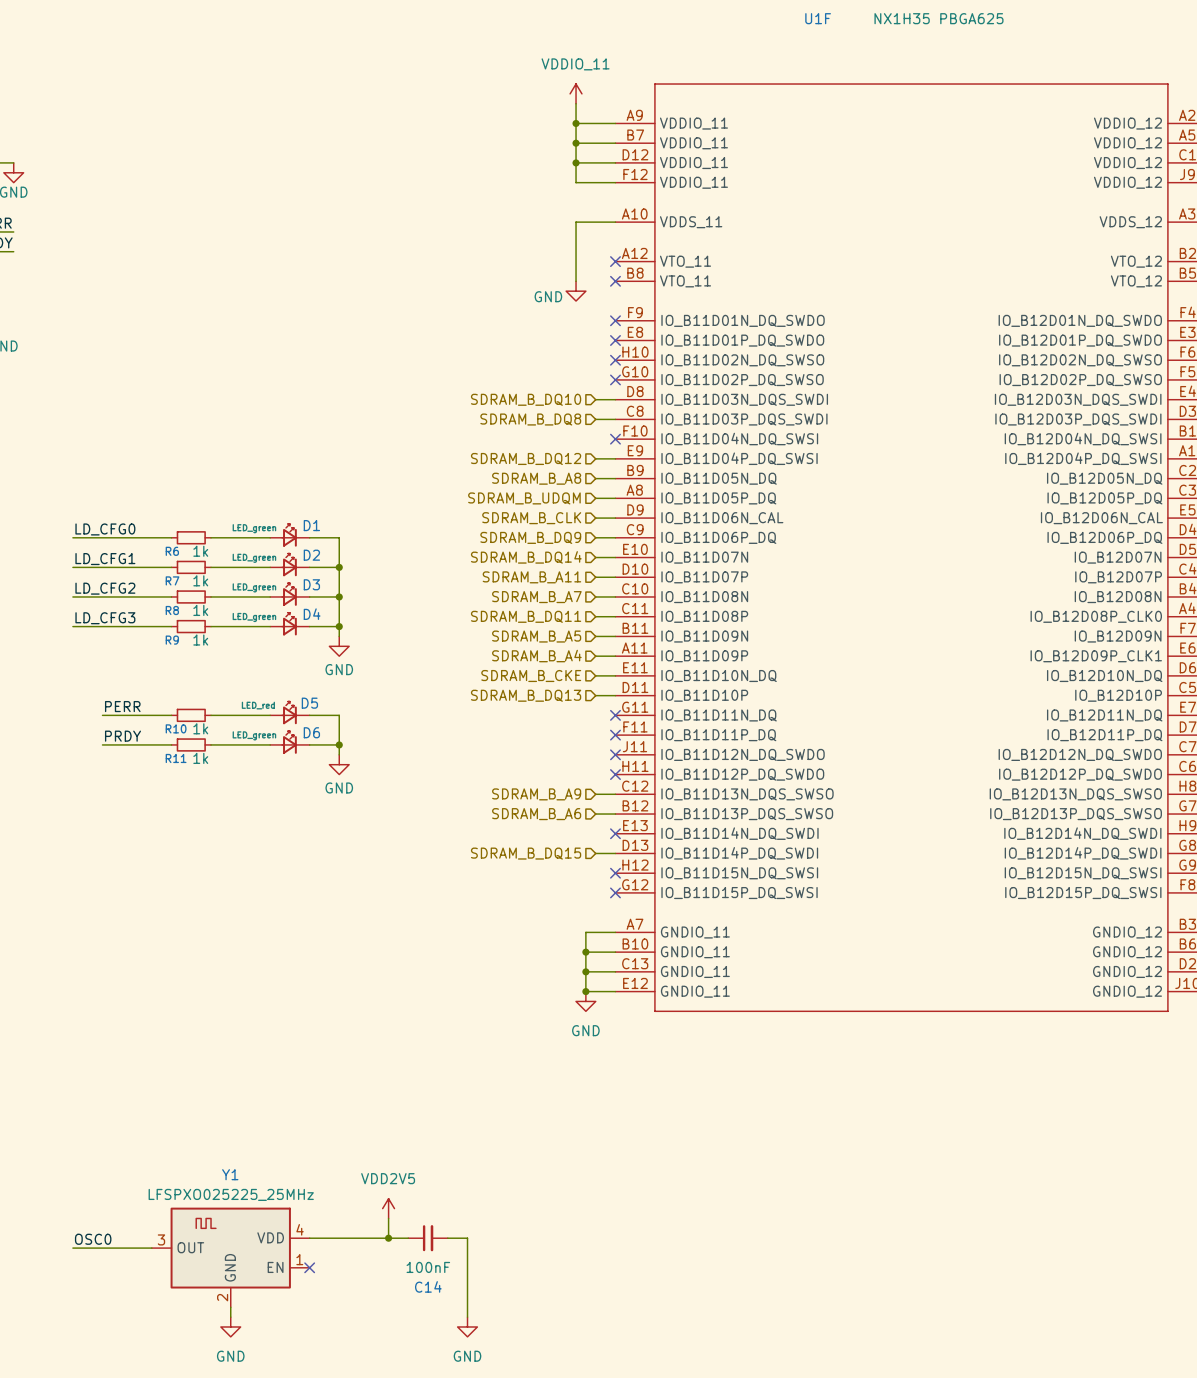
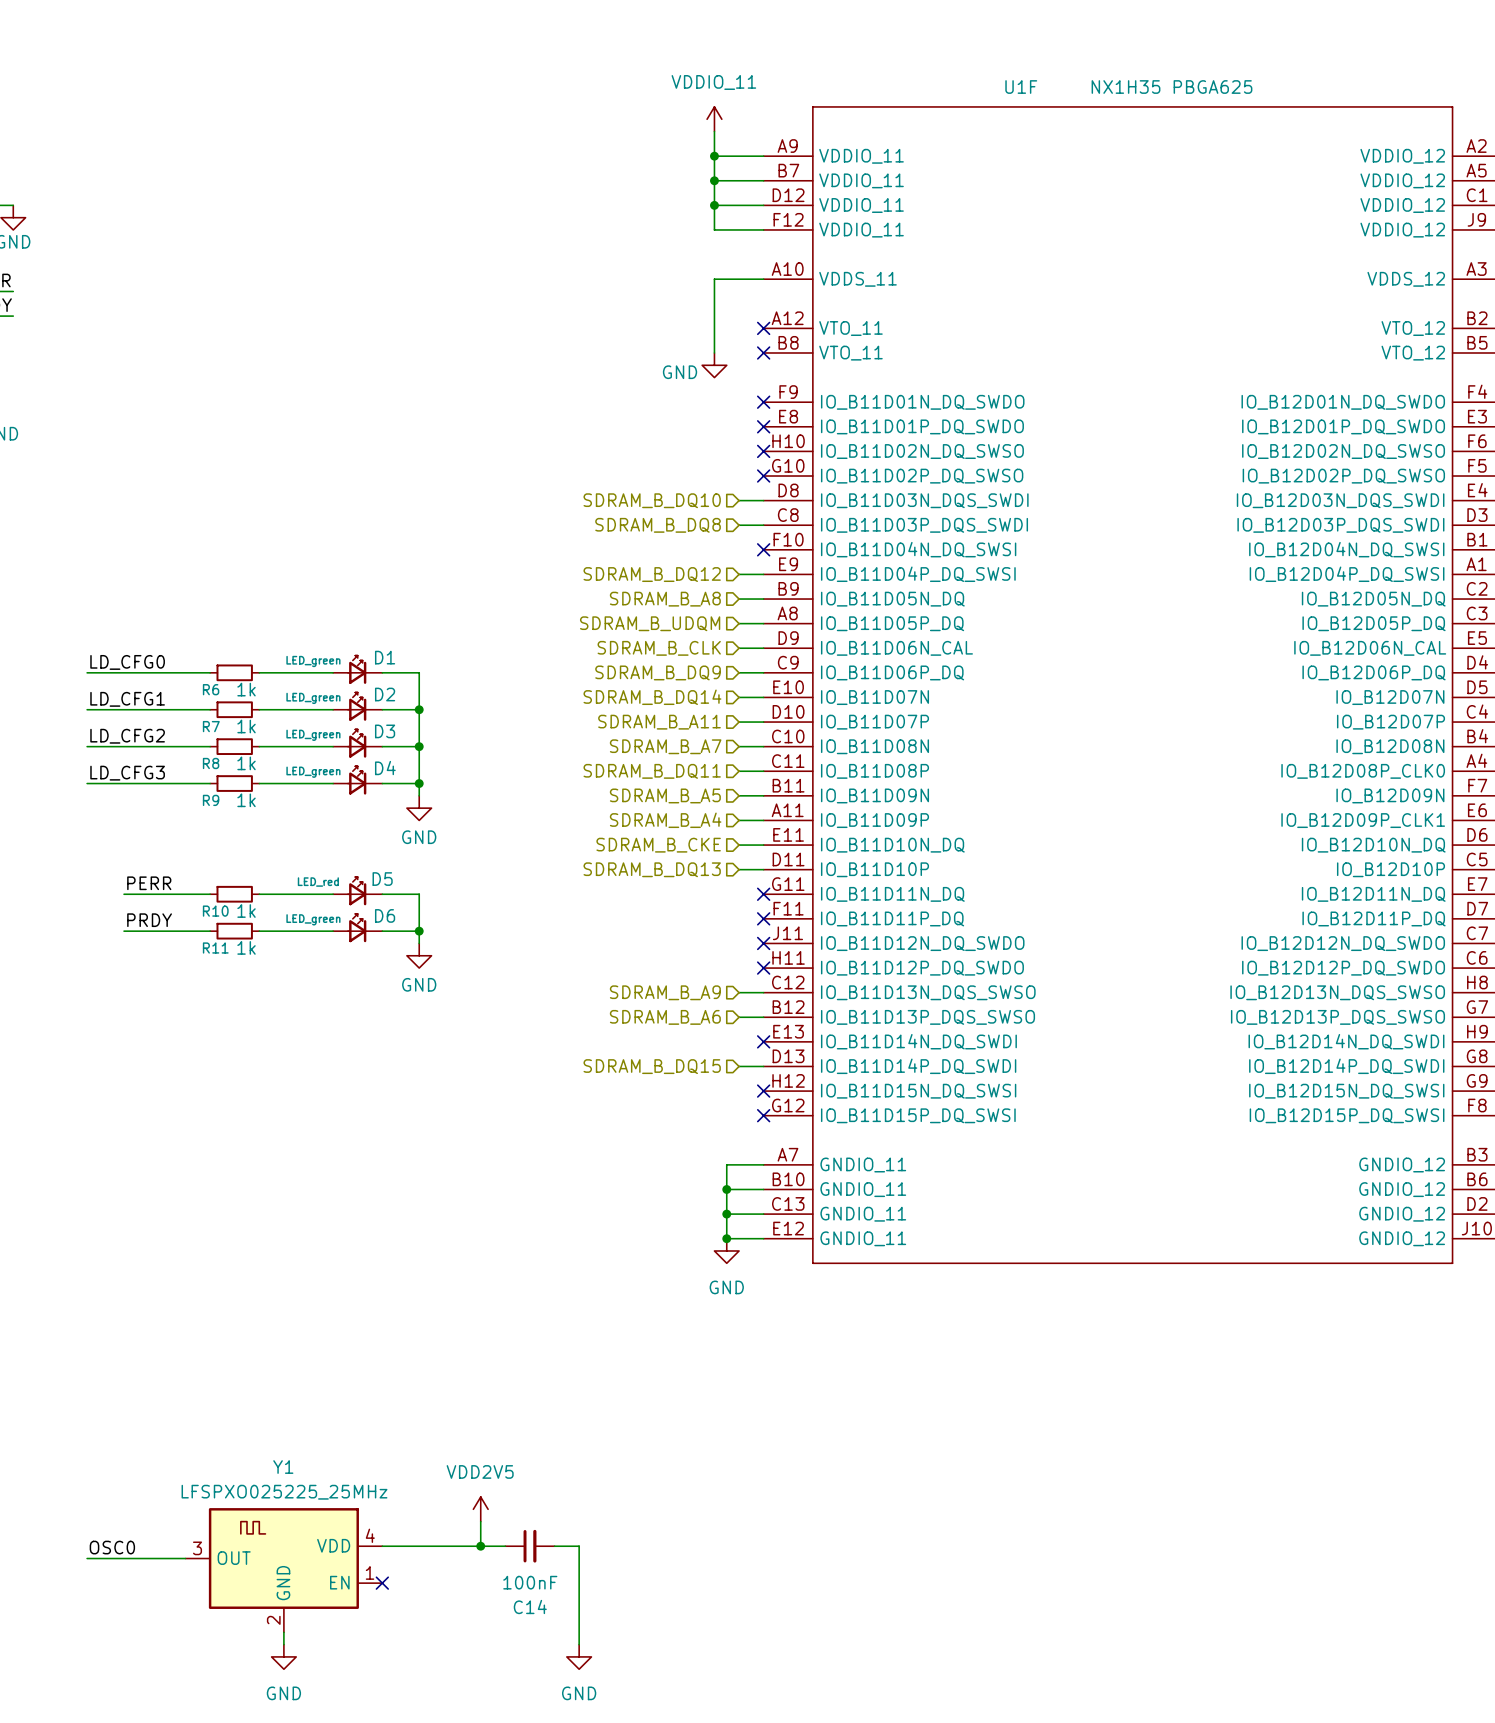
U1F name position: U1F (818, 18) -> U1F (1021, 87)
U1F value position: NX1H35 PBGA625 (938, 18) -> NX1H35 PBGA625 (1171, 87)

